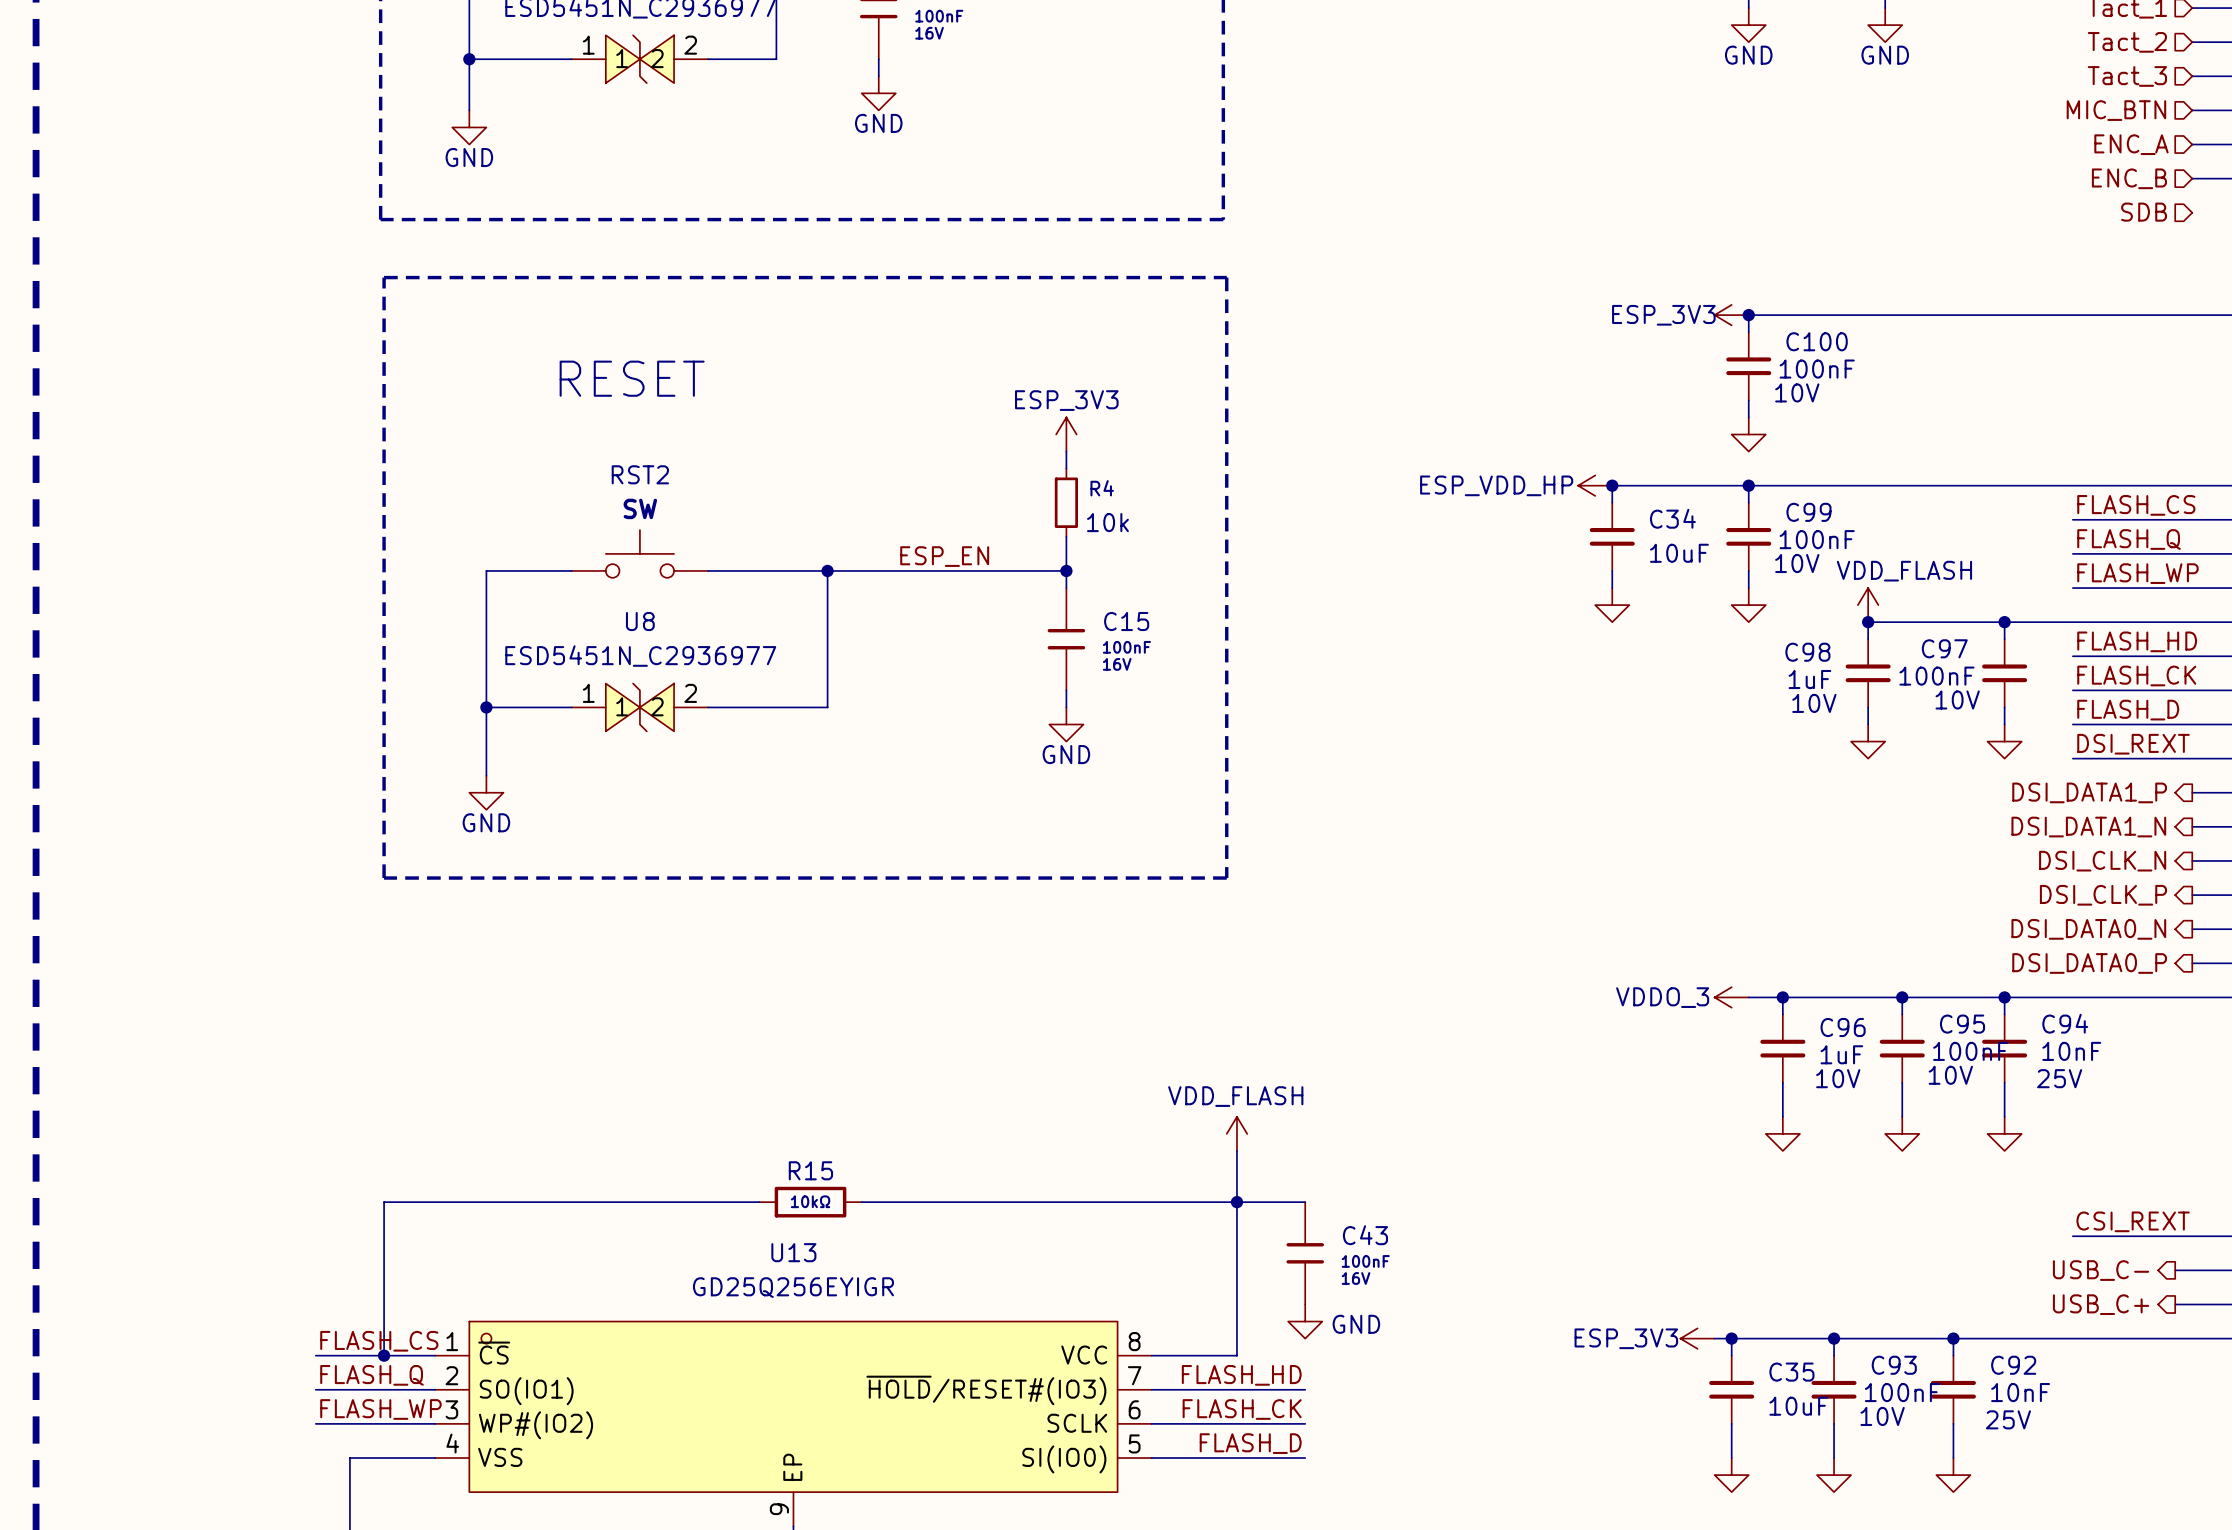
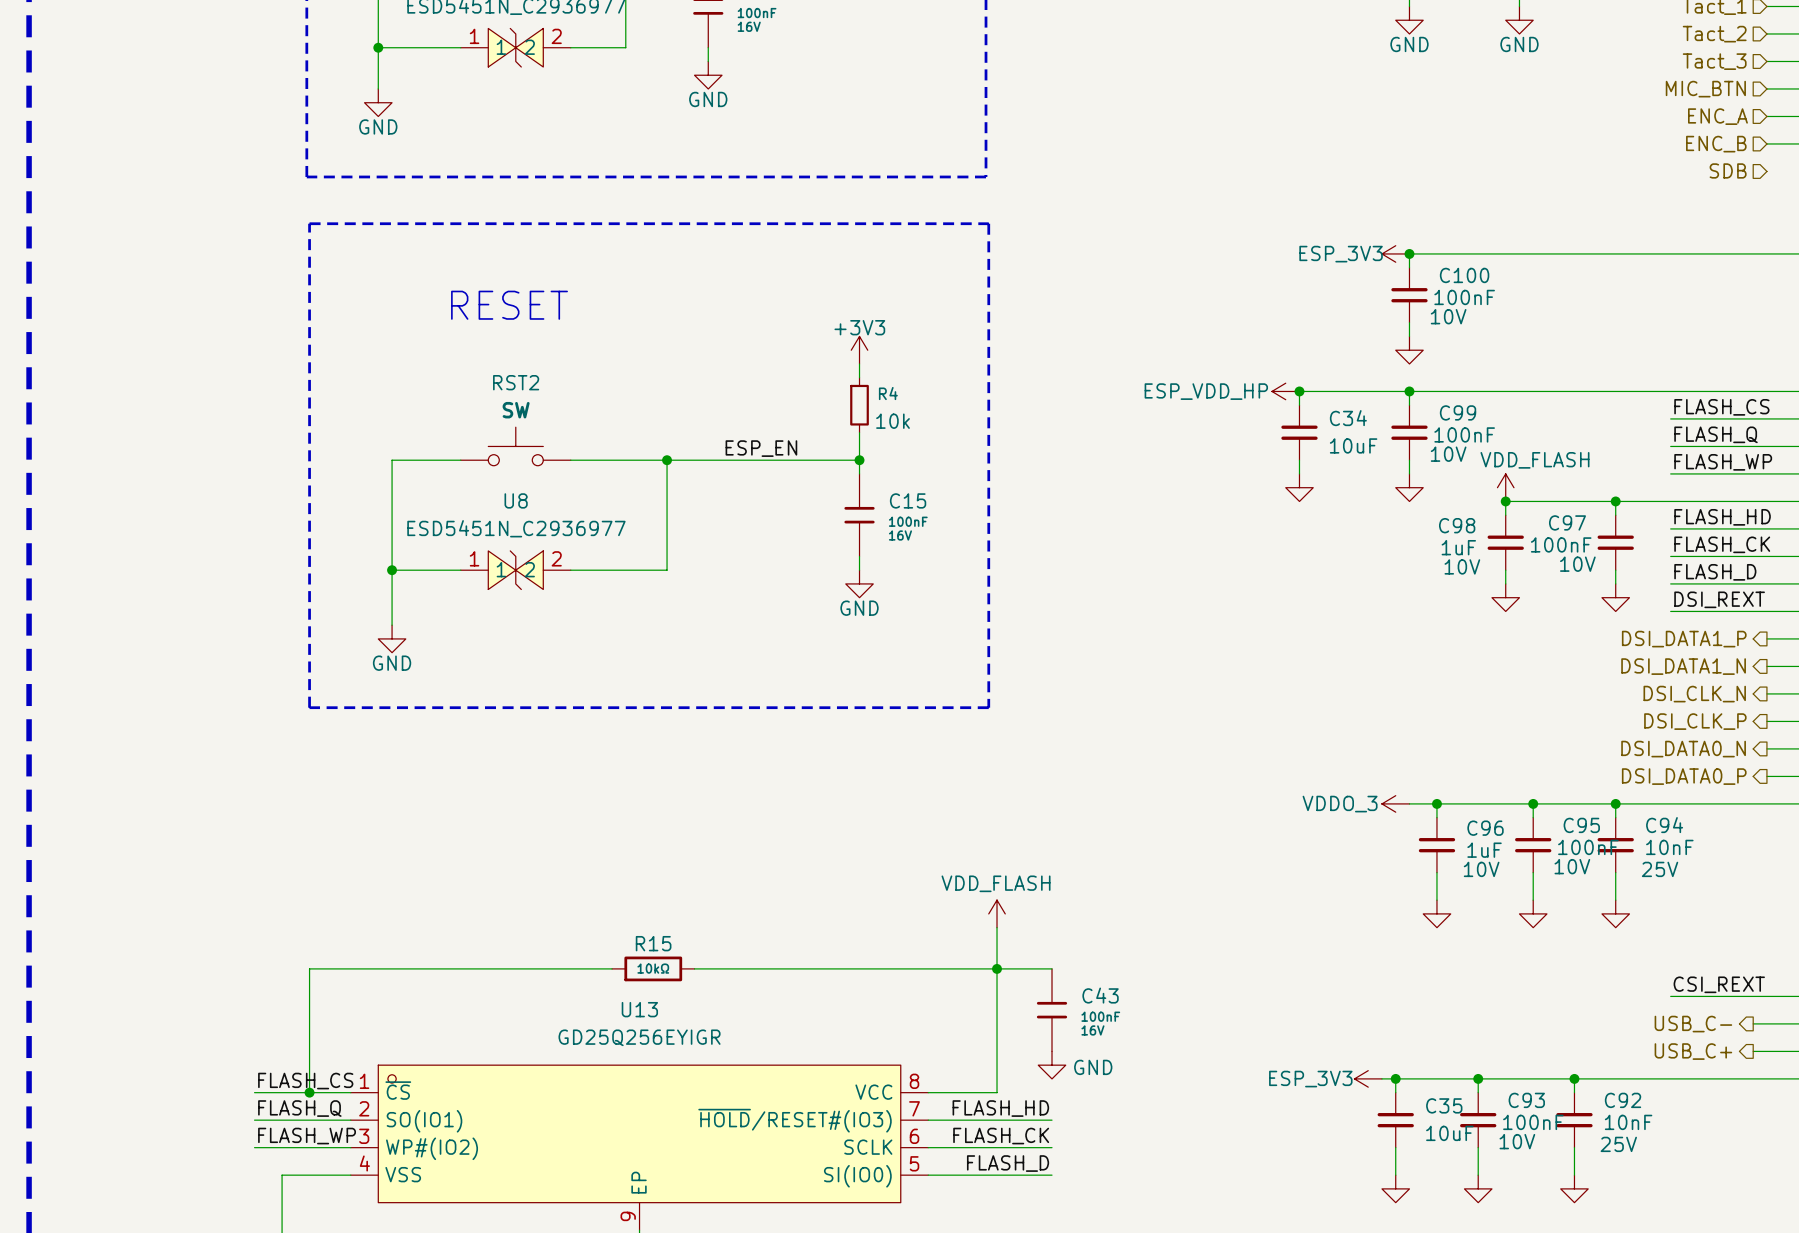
power symbol: ESP_3V3 (1066, 434) -> +3V3 (859, 350)

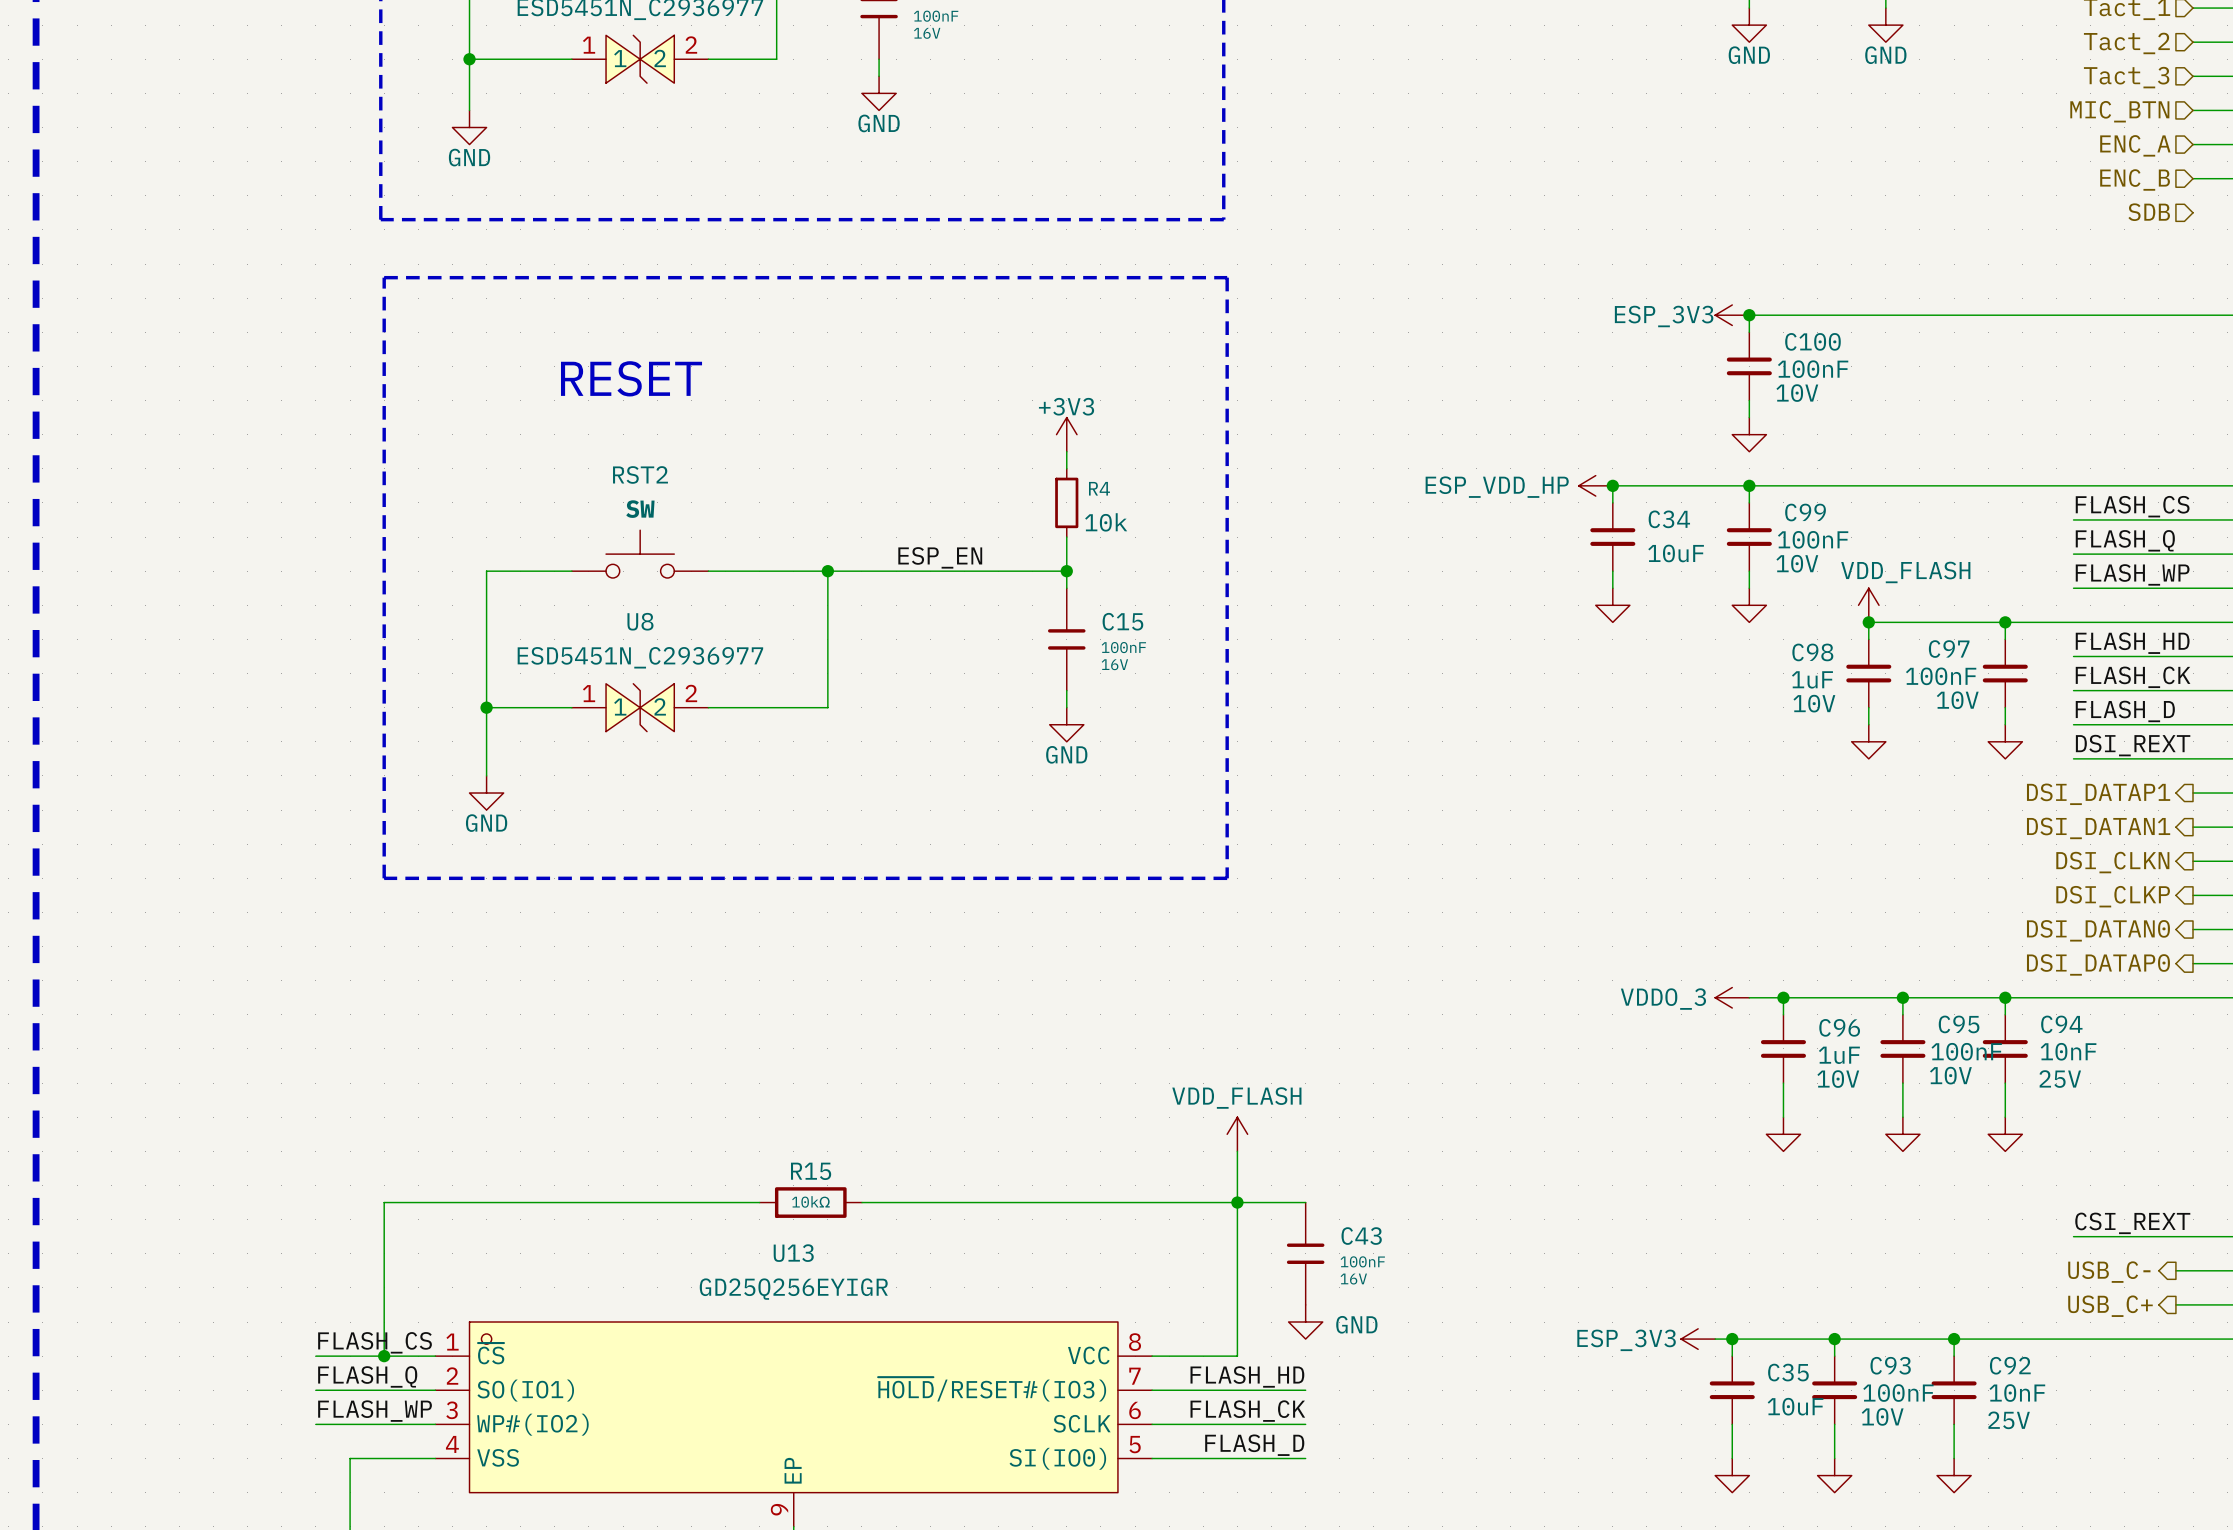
hierarchical label: DSI_DATA1_P (1684, 639) -> DSI_DATAP1 (2098, 794)
hierarchical label: DSI_DATA1_N (1683, 666) -> DSI_DATAN1 (2098, 828)
hierarchical label: DSI_CLK_N (1694, 694) -> DSI_CLKN (2112, 862)
hierarchical label: DSI_CLK_P (1695, 721) -> DSI_CLKP (2113, 896)
hierarchical label: DSI_DATA0_N (1683, 749) -> DSI_DATAN0 (2098, 930)
hierarchical label: DSI_DATA0_P (1684, 776) -> DSI_DATAP0 (2098, 964)

